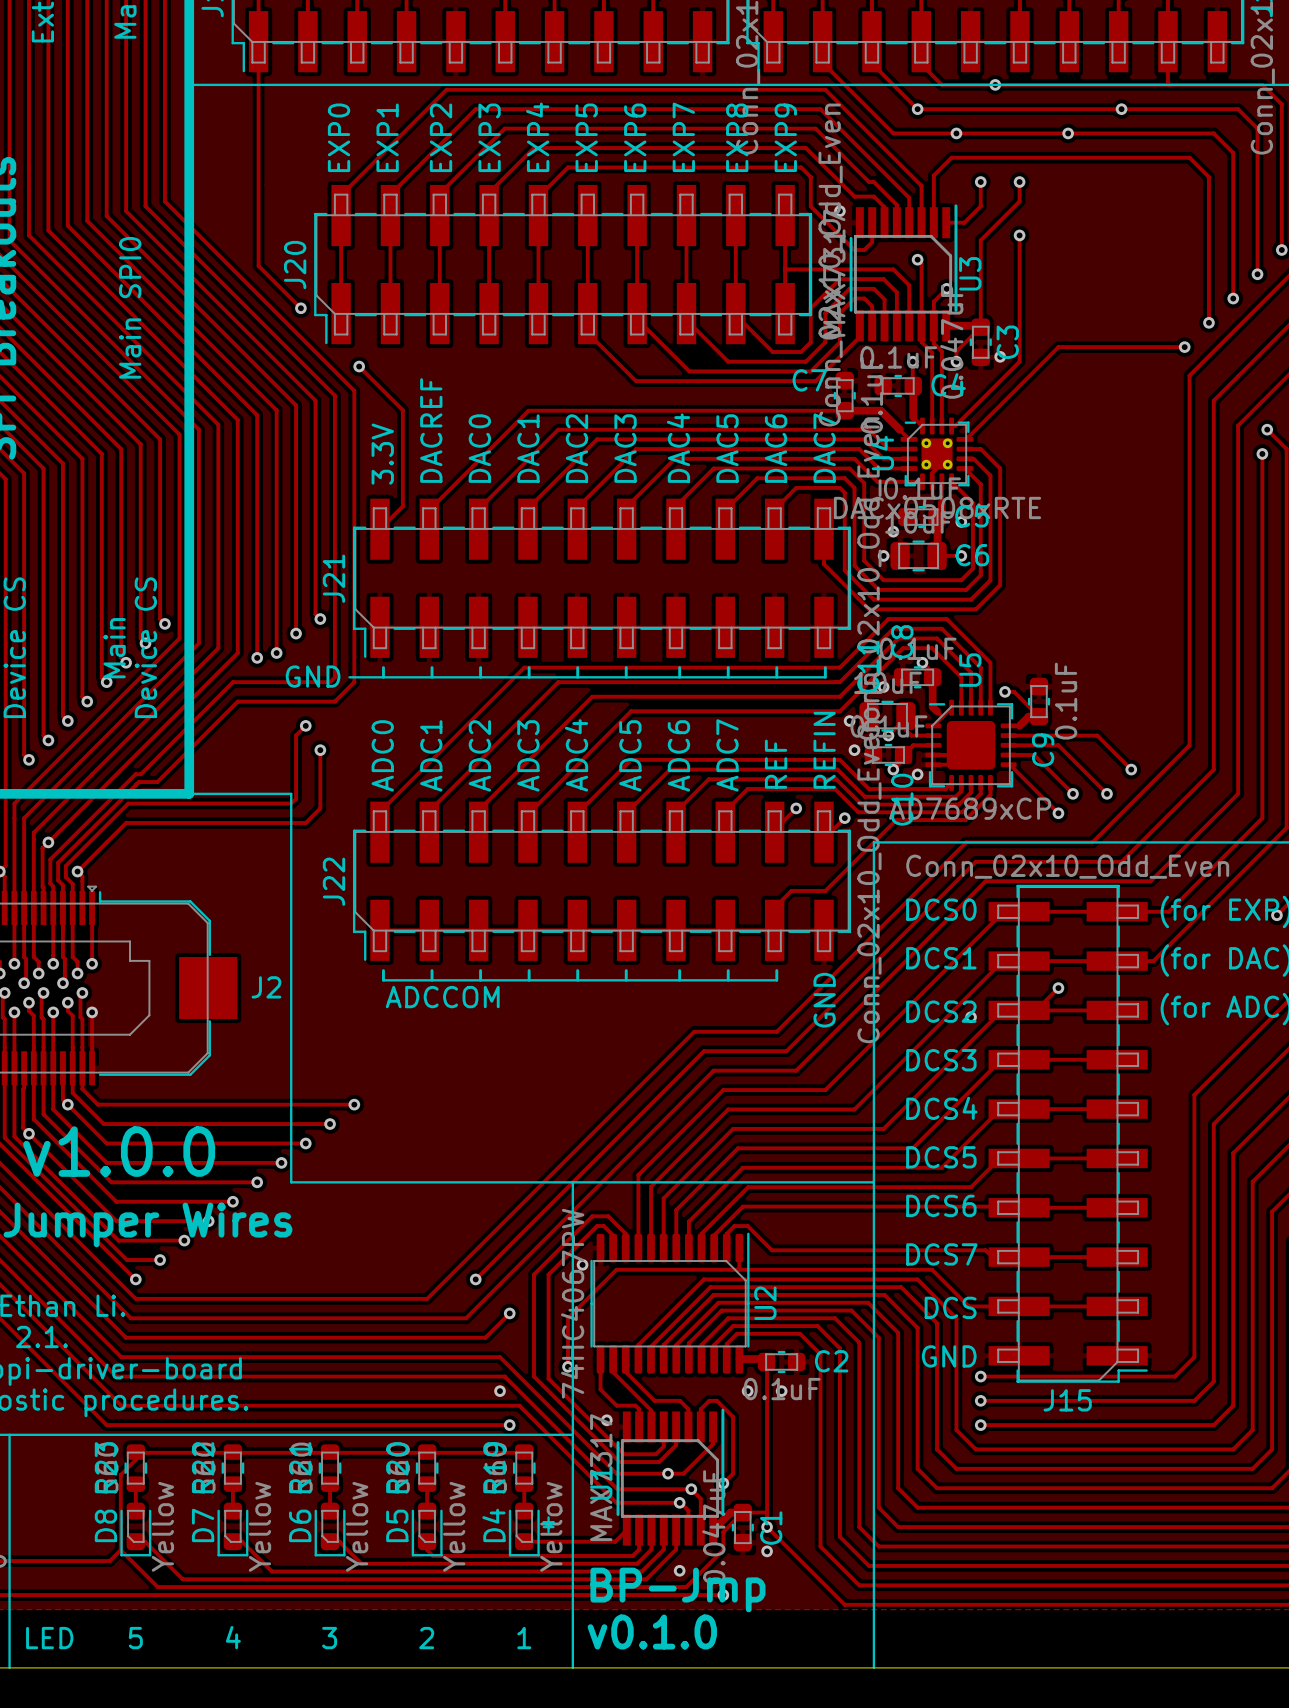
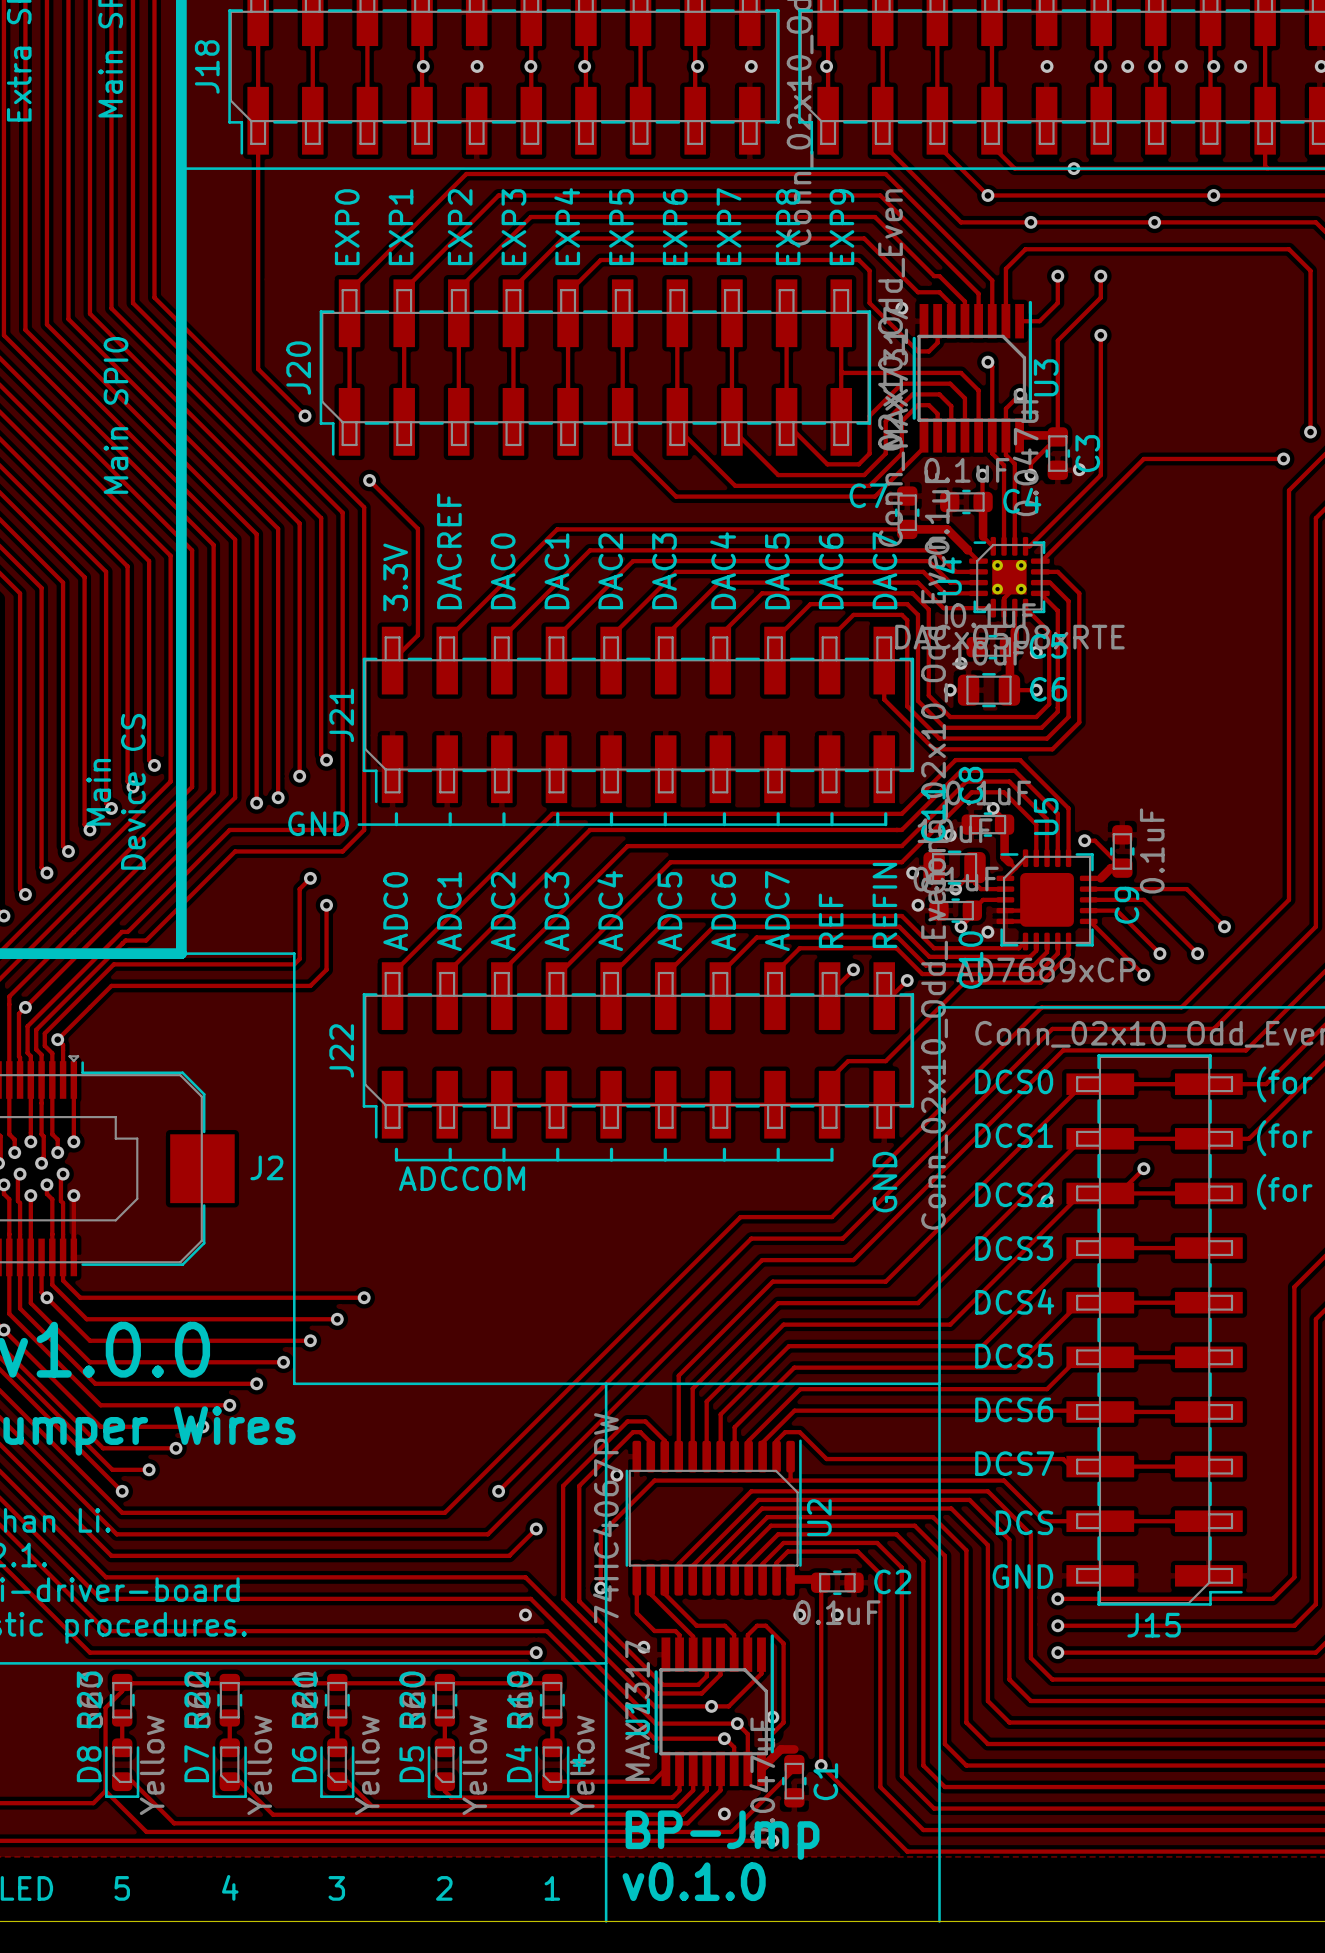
track: (733, 1473) (723, 1483) -> (783, 1706) (783, 1722) (772, 1733)
track: (767, 1512) (742, 1512) (723, 1531) (723, 1549) -> (794, 1764) (794, 1769) (772, 1790)
C1 position: (742, 1527) -> (794, 1781)
via: (767, 1551) -> none

